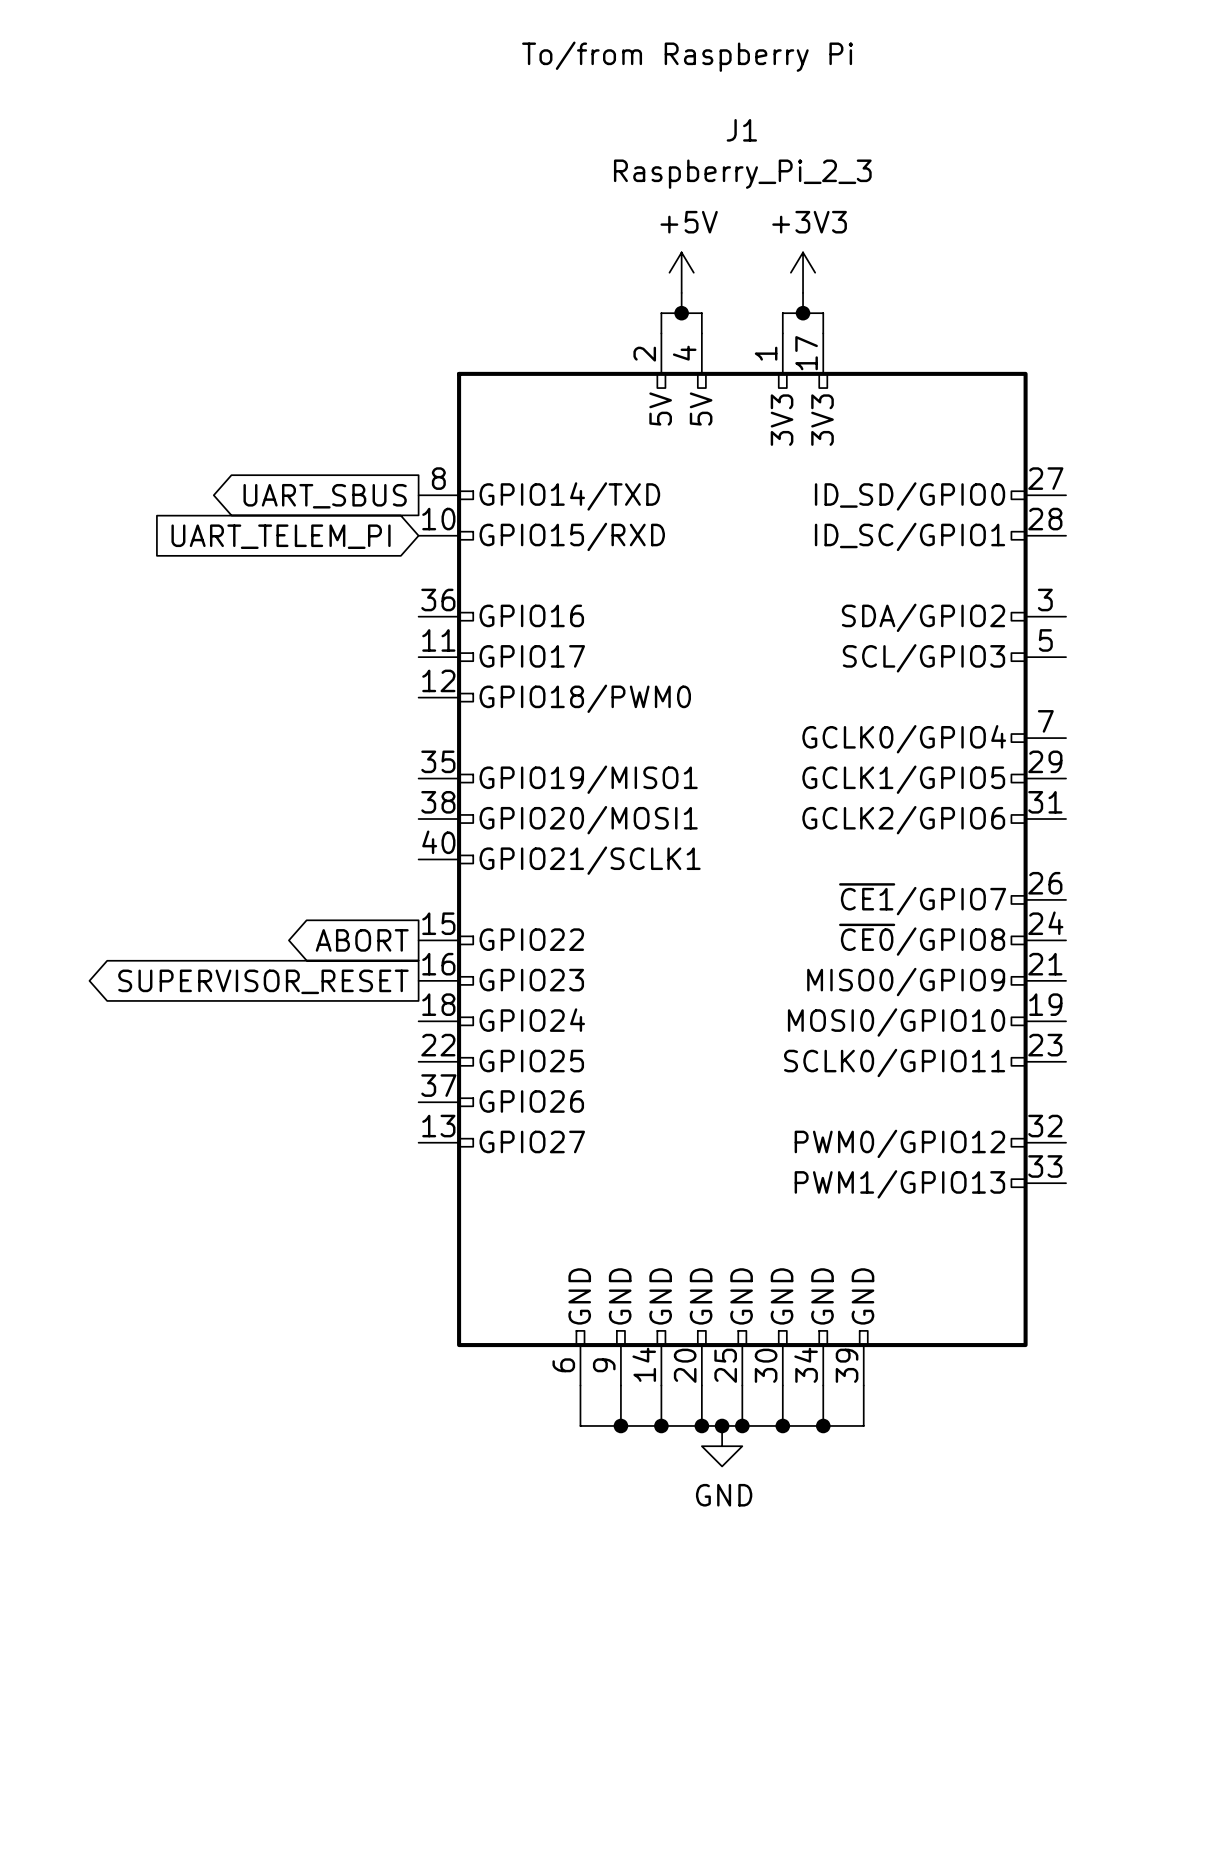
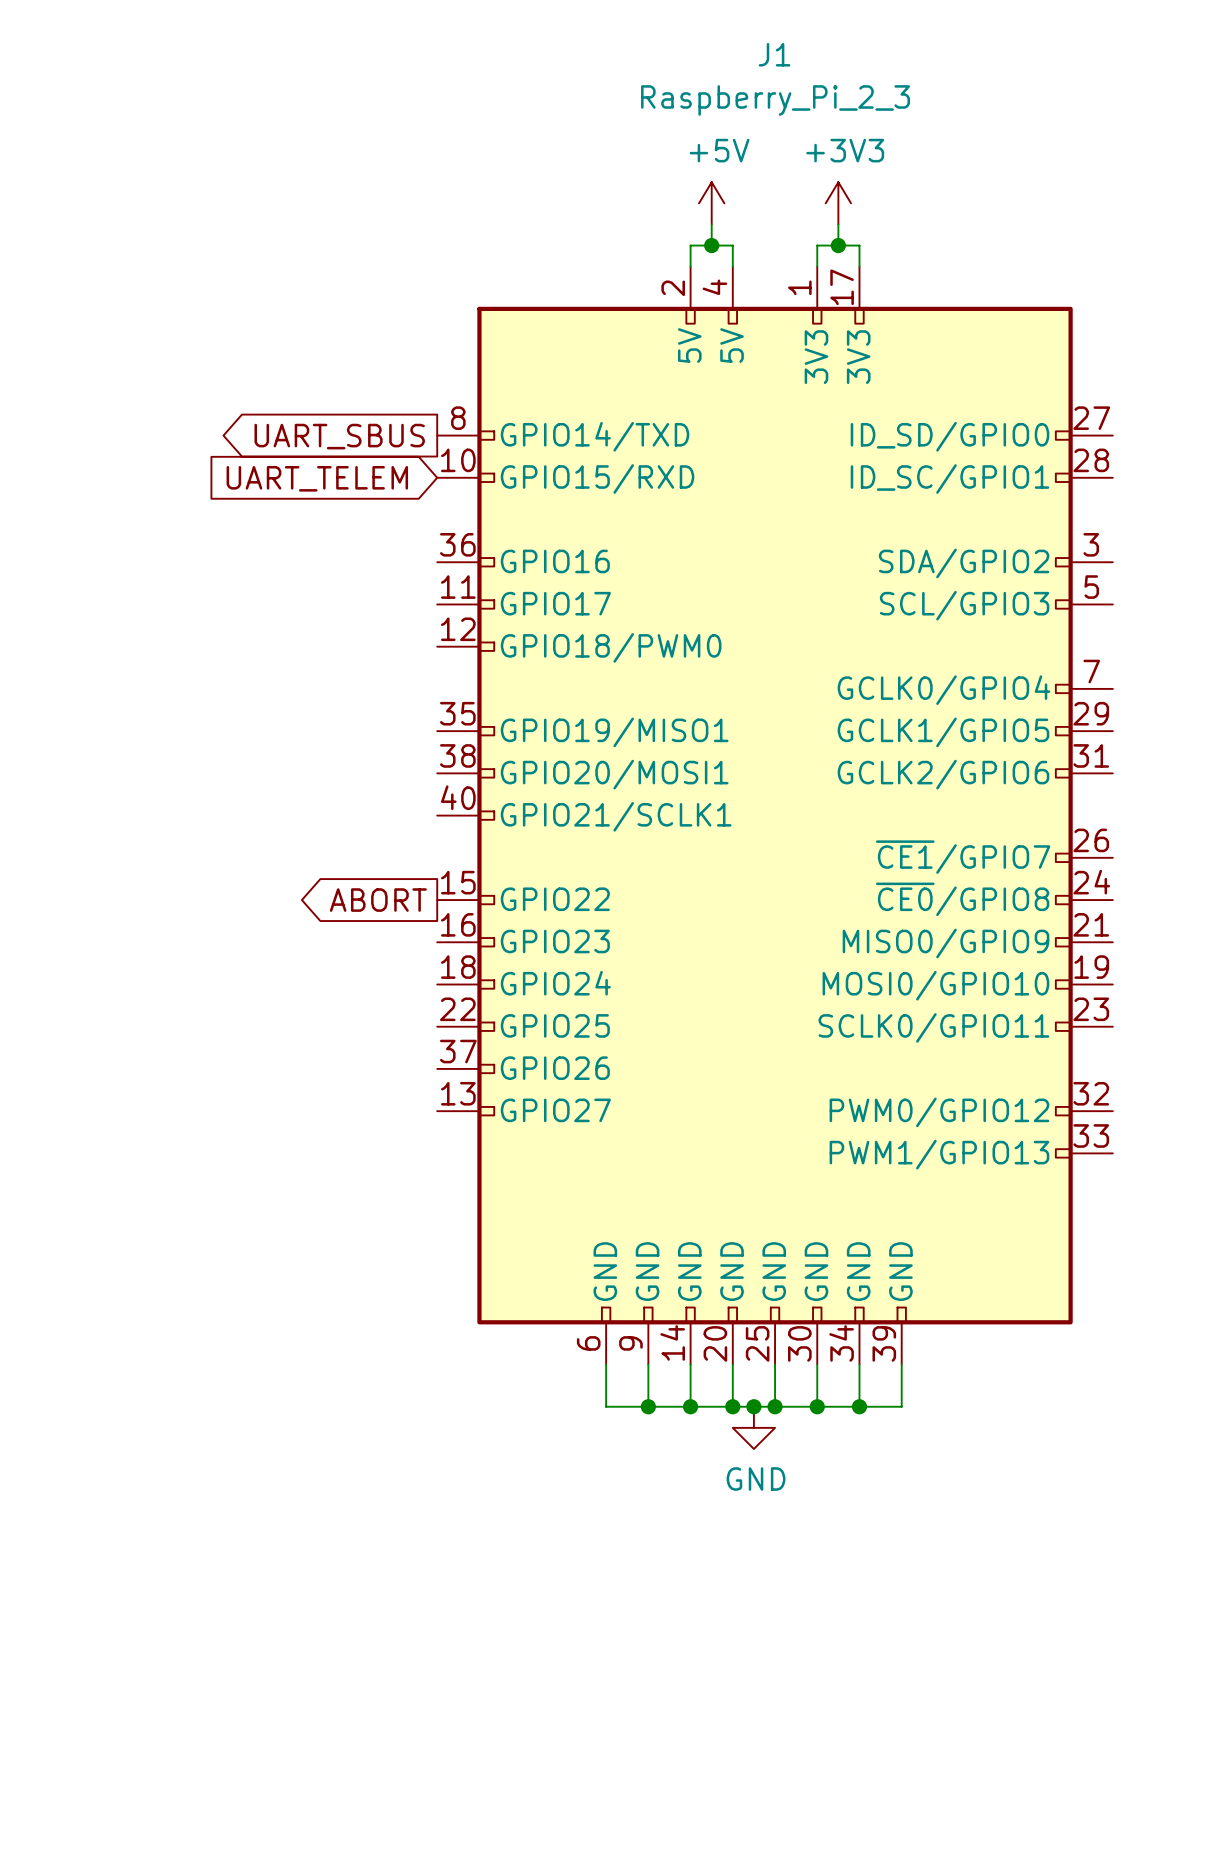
global label: UART_TELEM_PI (281, 536) -> UART_TELEM (317, 478)
global label: SUPERVISOR_RESET (263, 981) -> none

